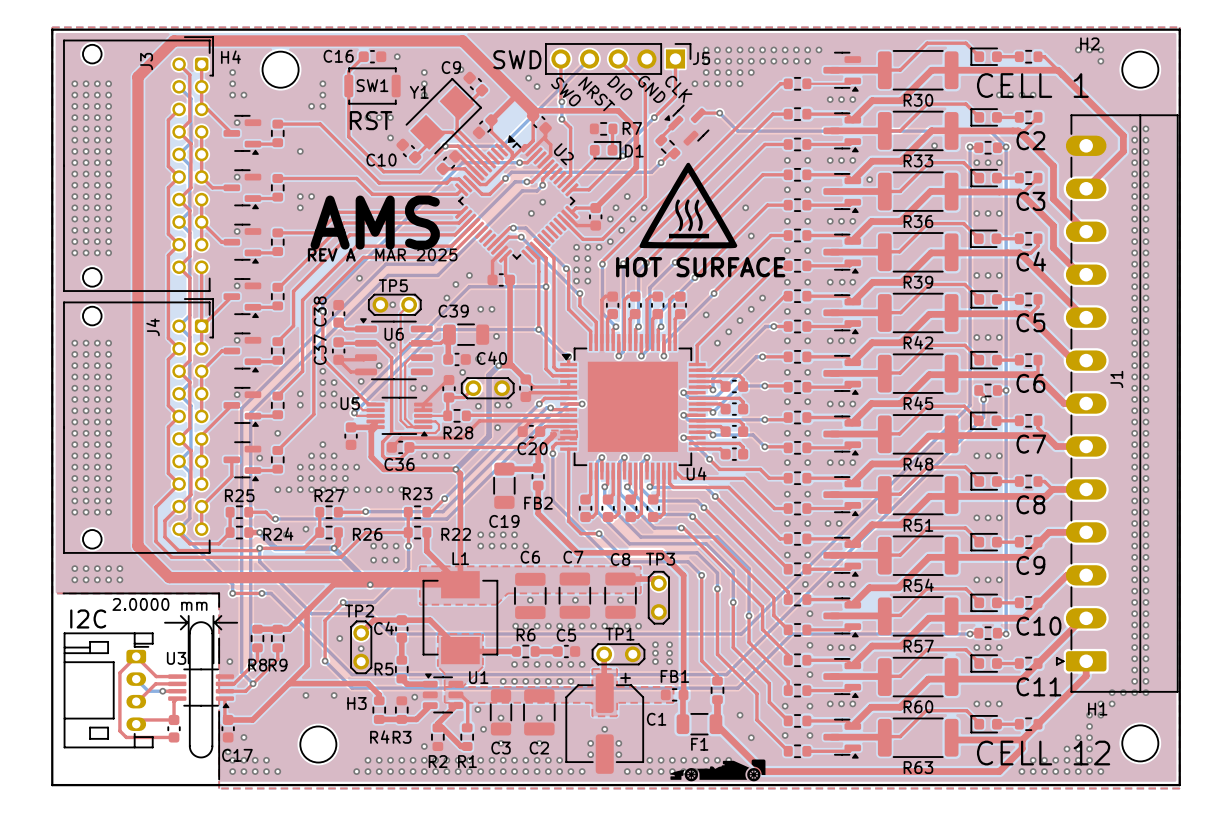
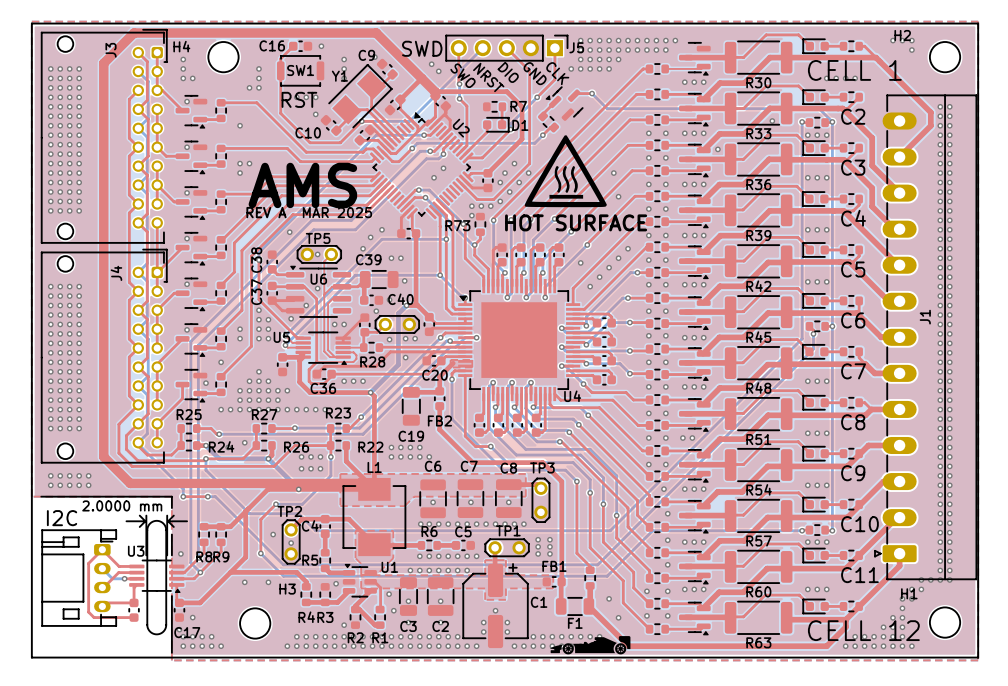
via: (587, 258) -> none
R73: none -> (480, 224)
via: (576, 269) -> none
via: (587, 269) -> none
top track: none -> (480, 232) (480, 239) (474, 244)
via: (576, 281) -> none
via: (587, 281) -> none

